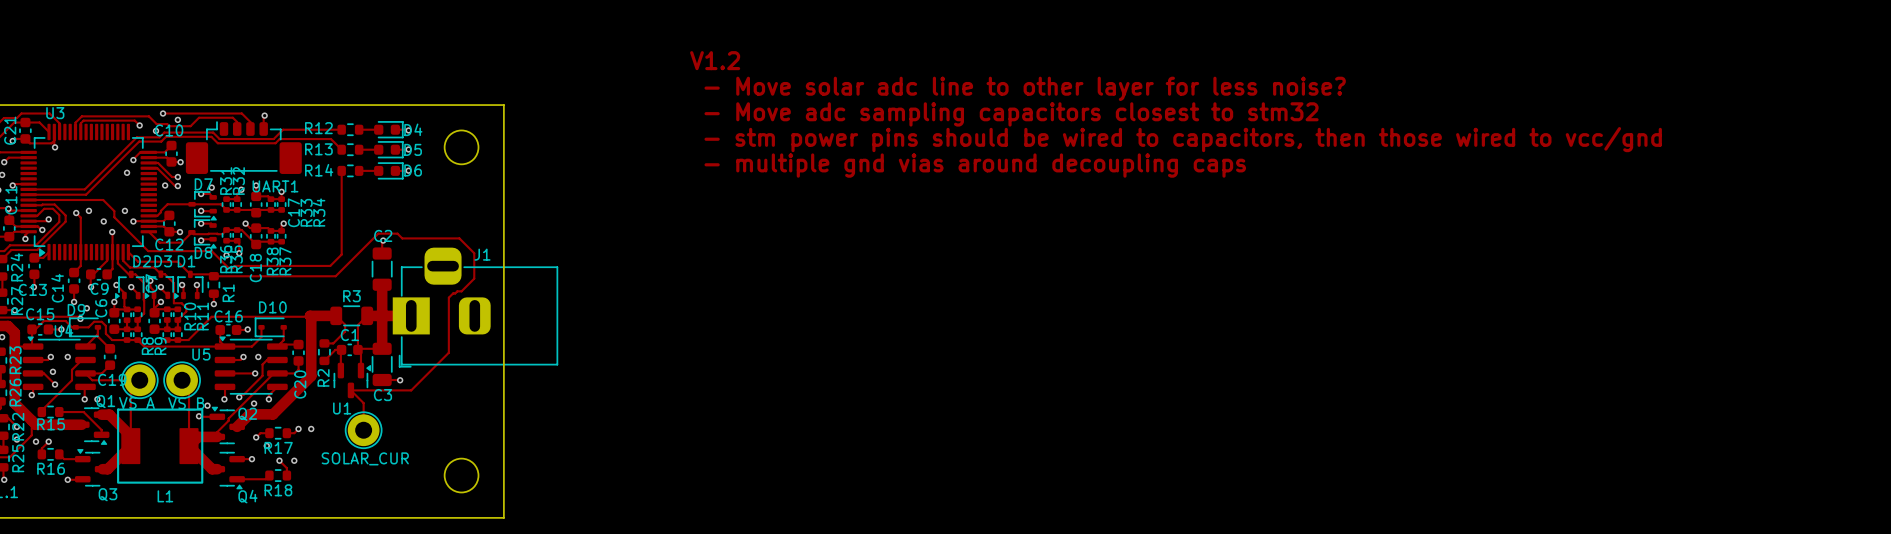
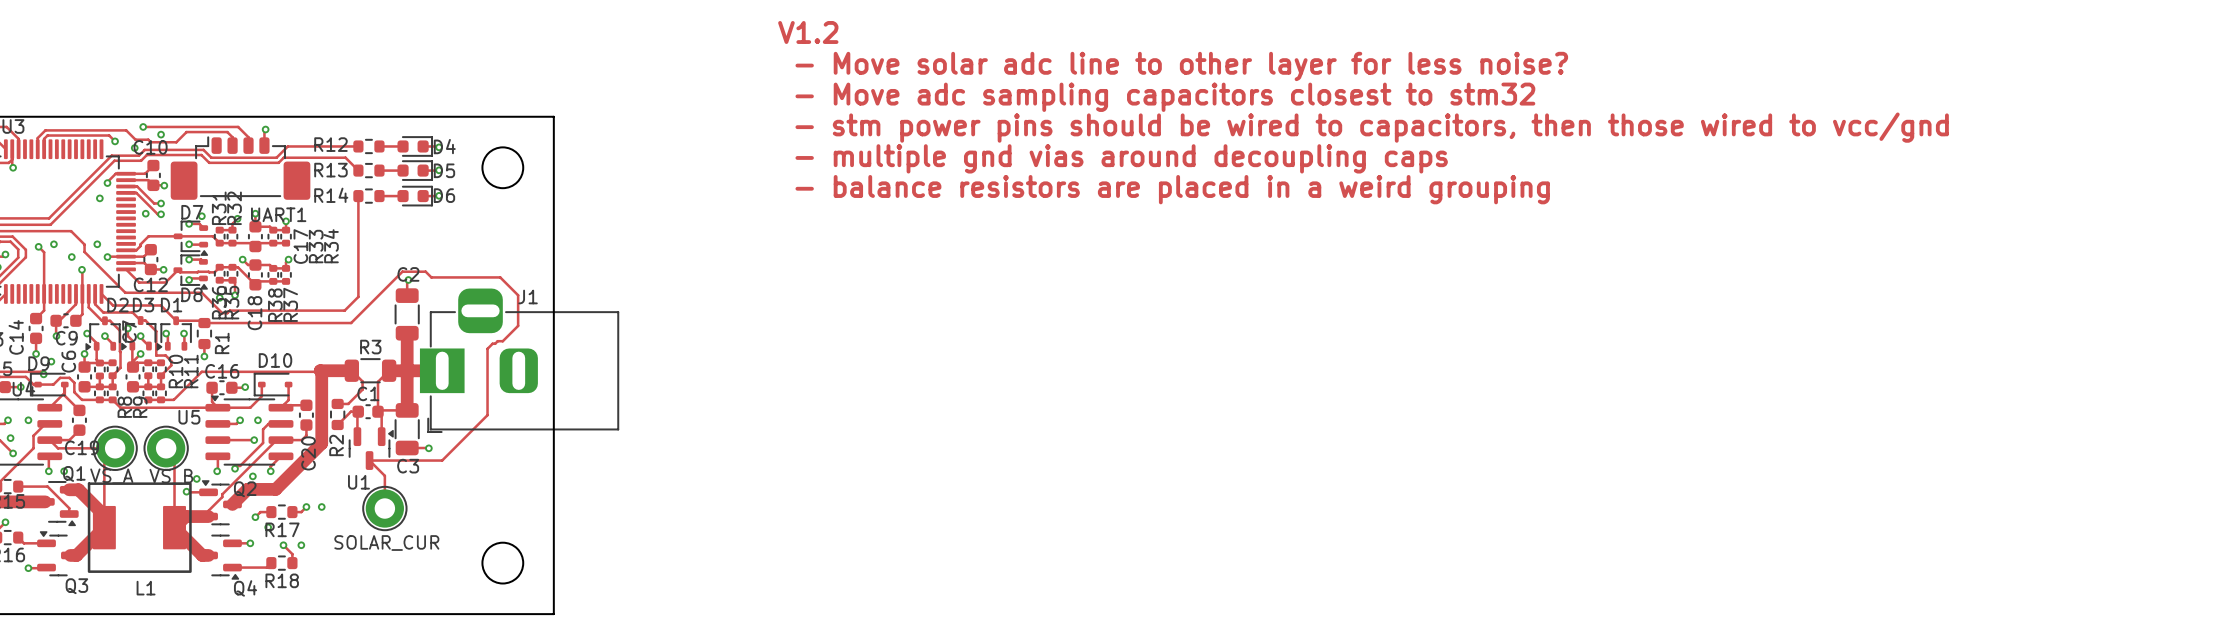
text: none -> V1.2 (808, 32)
text: V1.2 (715, 60) -> - Move solar adc line to other layer for less noise? (1181, 66)
text: - Move solar adc line to other layer for less noise? (1025, 88) -> - Move adc sampling capacitors closest to stm32 (1165, 97)
text: - Move adc sampling capacitors closest to stm32 (1011, 114) -> - stm power pins should be wired to capacitors, then those wired to vcc/gnd (1372, 127)
text: - stm power pins should be wired to capacitors, then those wired to vcc/gnd (1183, 139) -> - multiple gnd vias around decoupling caps (1121, 158)
text: - multiple gnd vias around decoupling caps (975, 165) -> - balance resistors are placed in a weird grouping (1172, 189)

